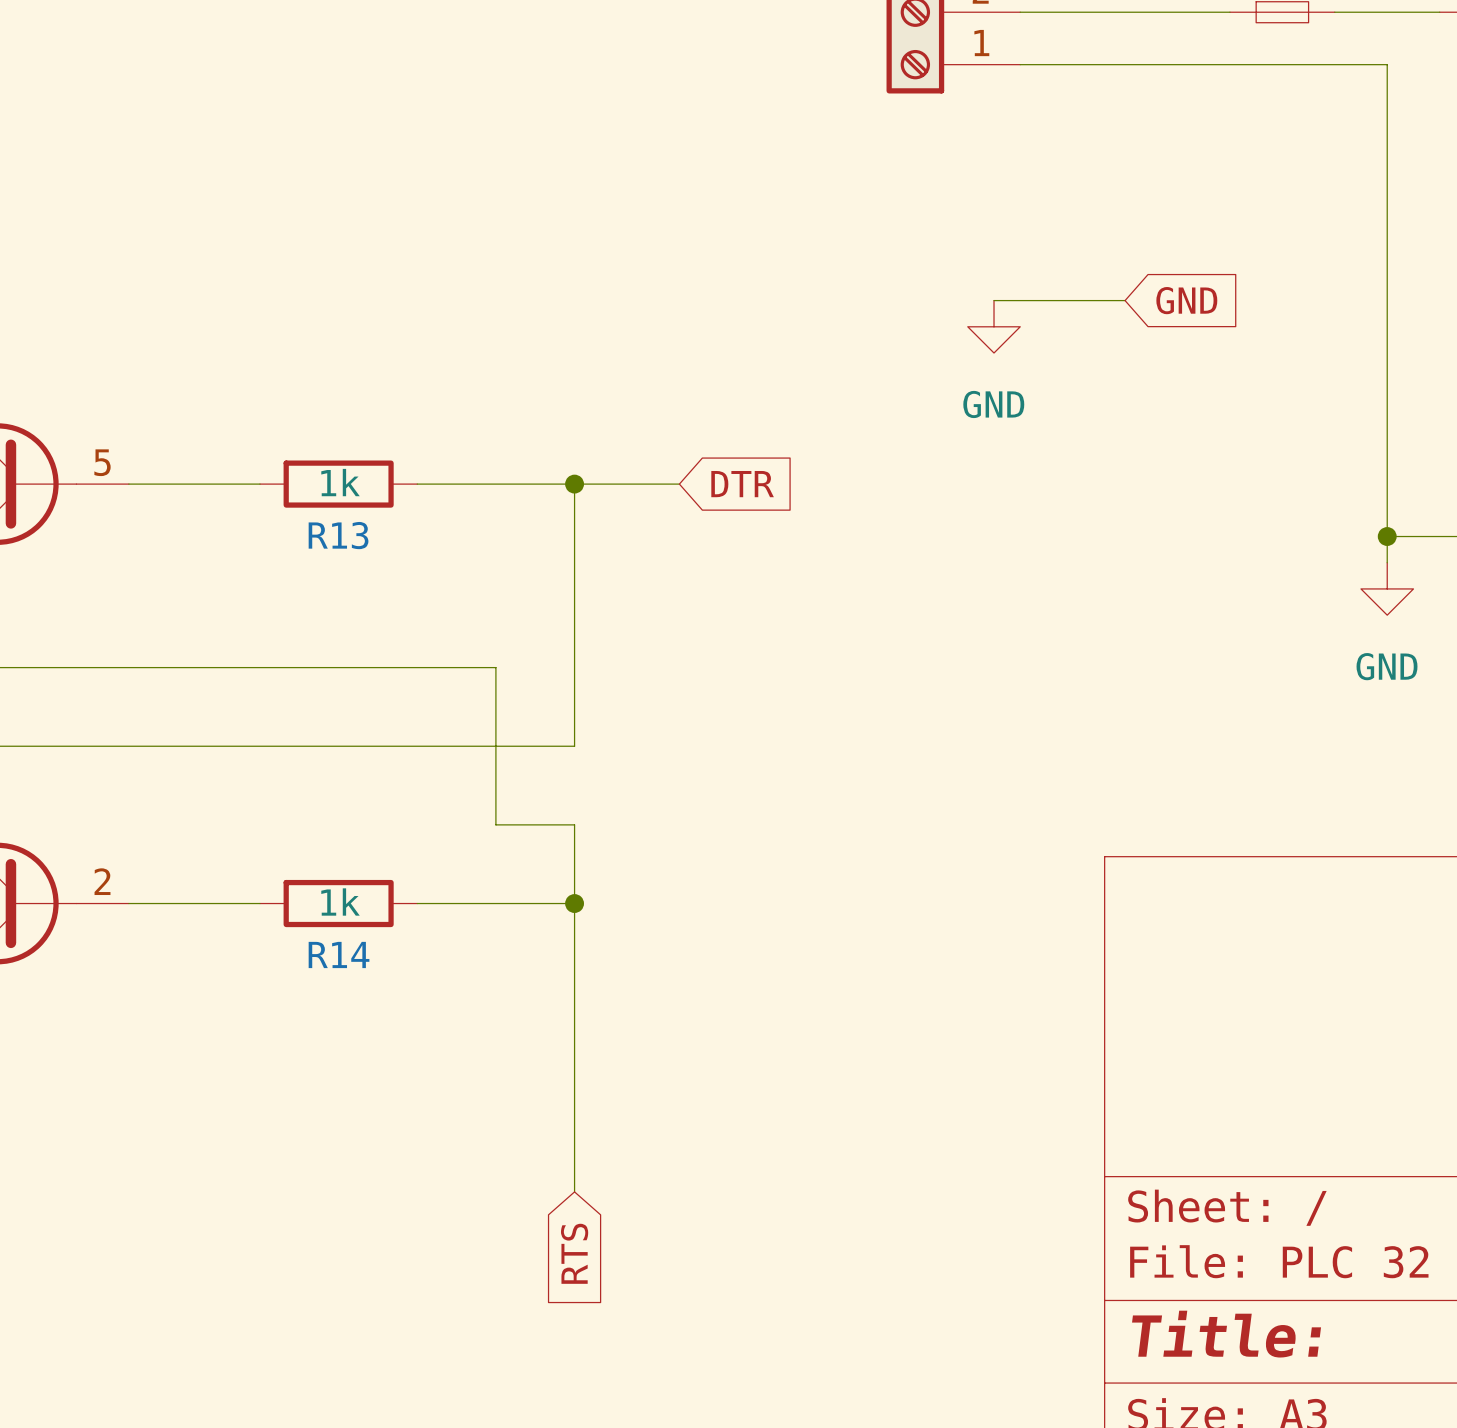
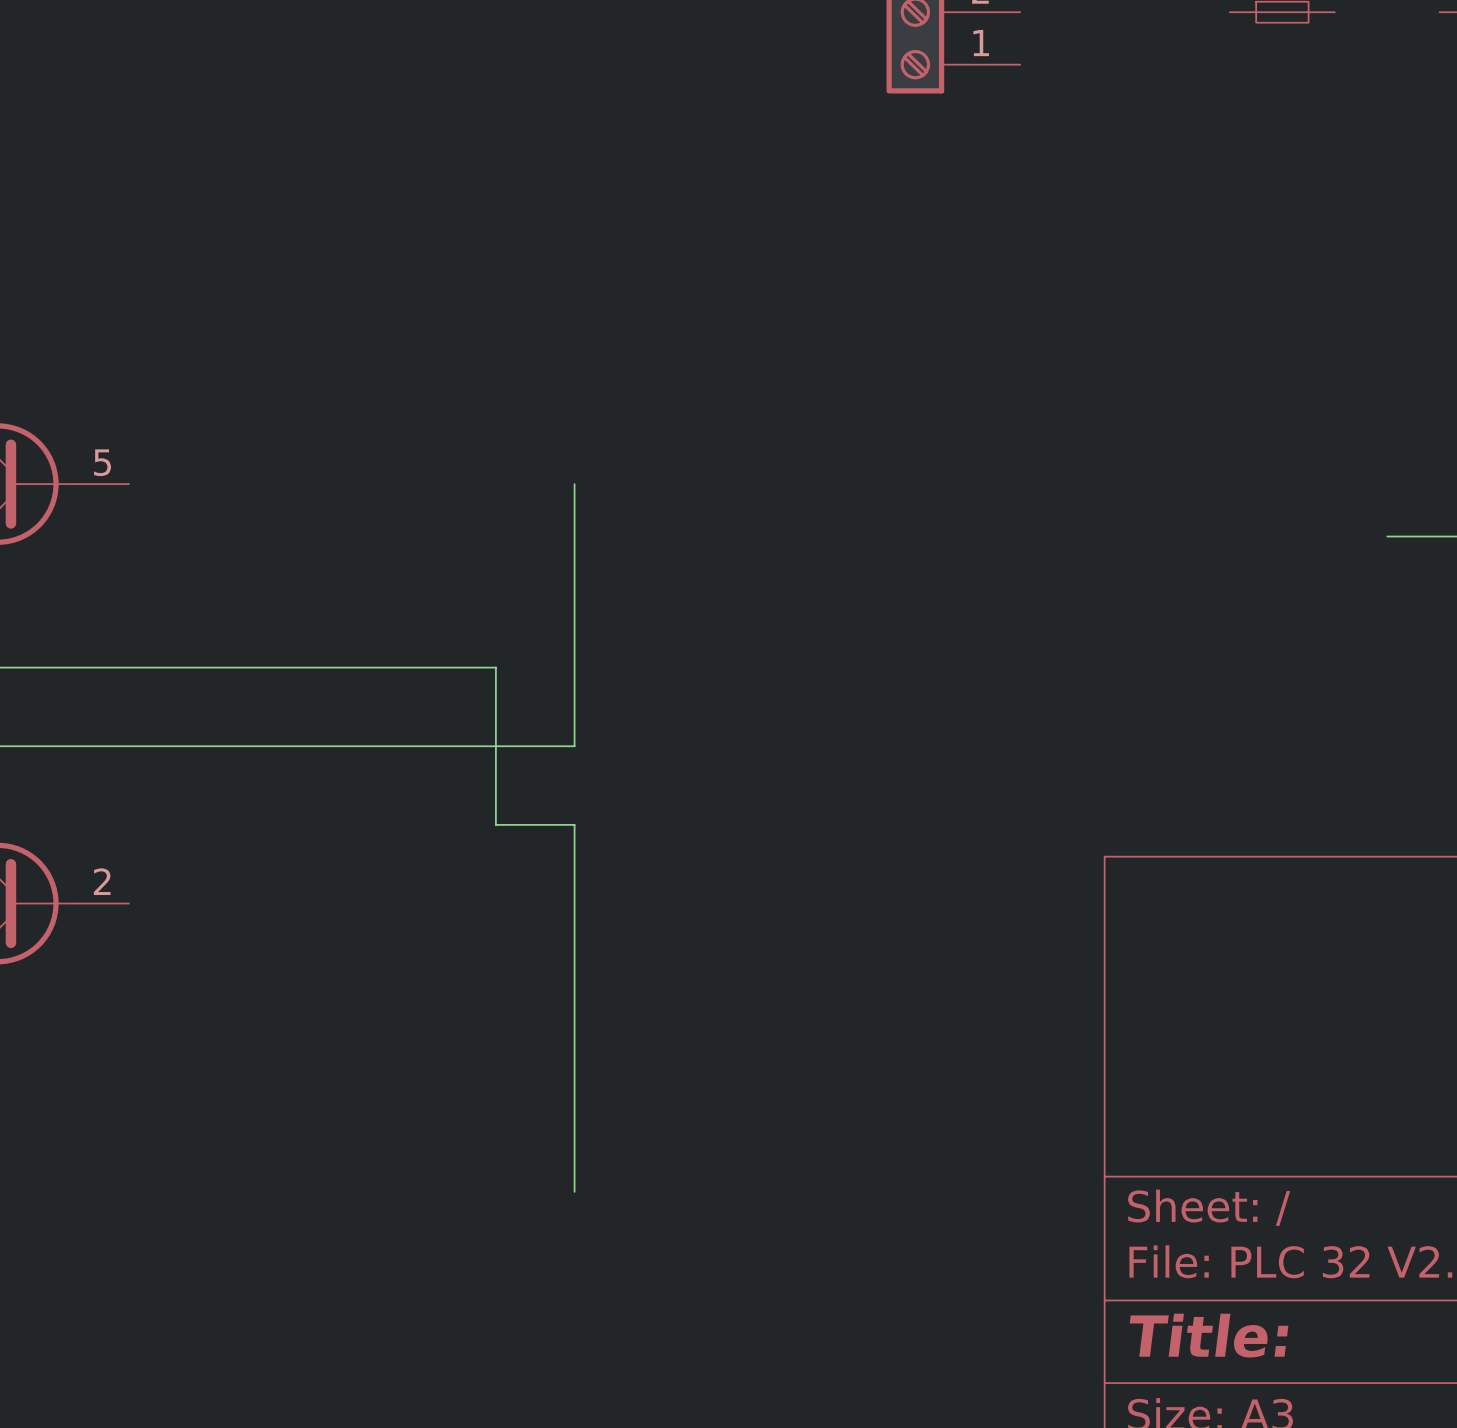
wire: (1020, 12) (1229, 12) -> none
wire: (1334, 12) (1439, 12) -> none
wire: (1020, 64) (1387, 64) (1387, 562) -> none
wire: (994, 300) (1125, 300) -> none
global label: GND (1186, 300) -> none
power symbol: GND (994, 326) -> none
wire: (128, 484) (259, 484) -> none
R13: 1k (338, 484) -> none
wire: (417, 484) (679, 484) -> none
junction: (574, 484) -> none
global label: DTR (742, 484) -> none
junction: (1387, 536) -> none
power symbol: GND (1387, 588) -> none
wire: (128, 903) (259, 903) -> none
R14: 1k (338, 903) -> none
wire: (417, 903) (574, 903) -> none
junction: (574, 903) -> none
global label: RTS (574, 1253) -> none

